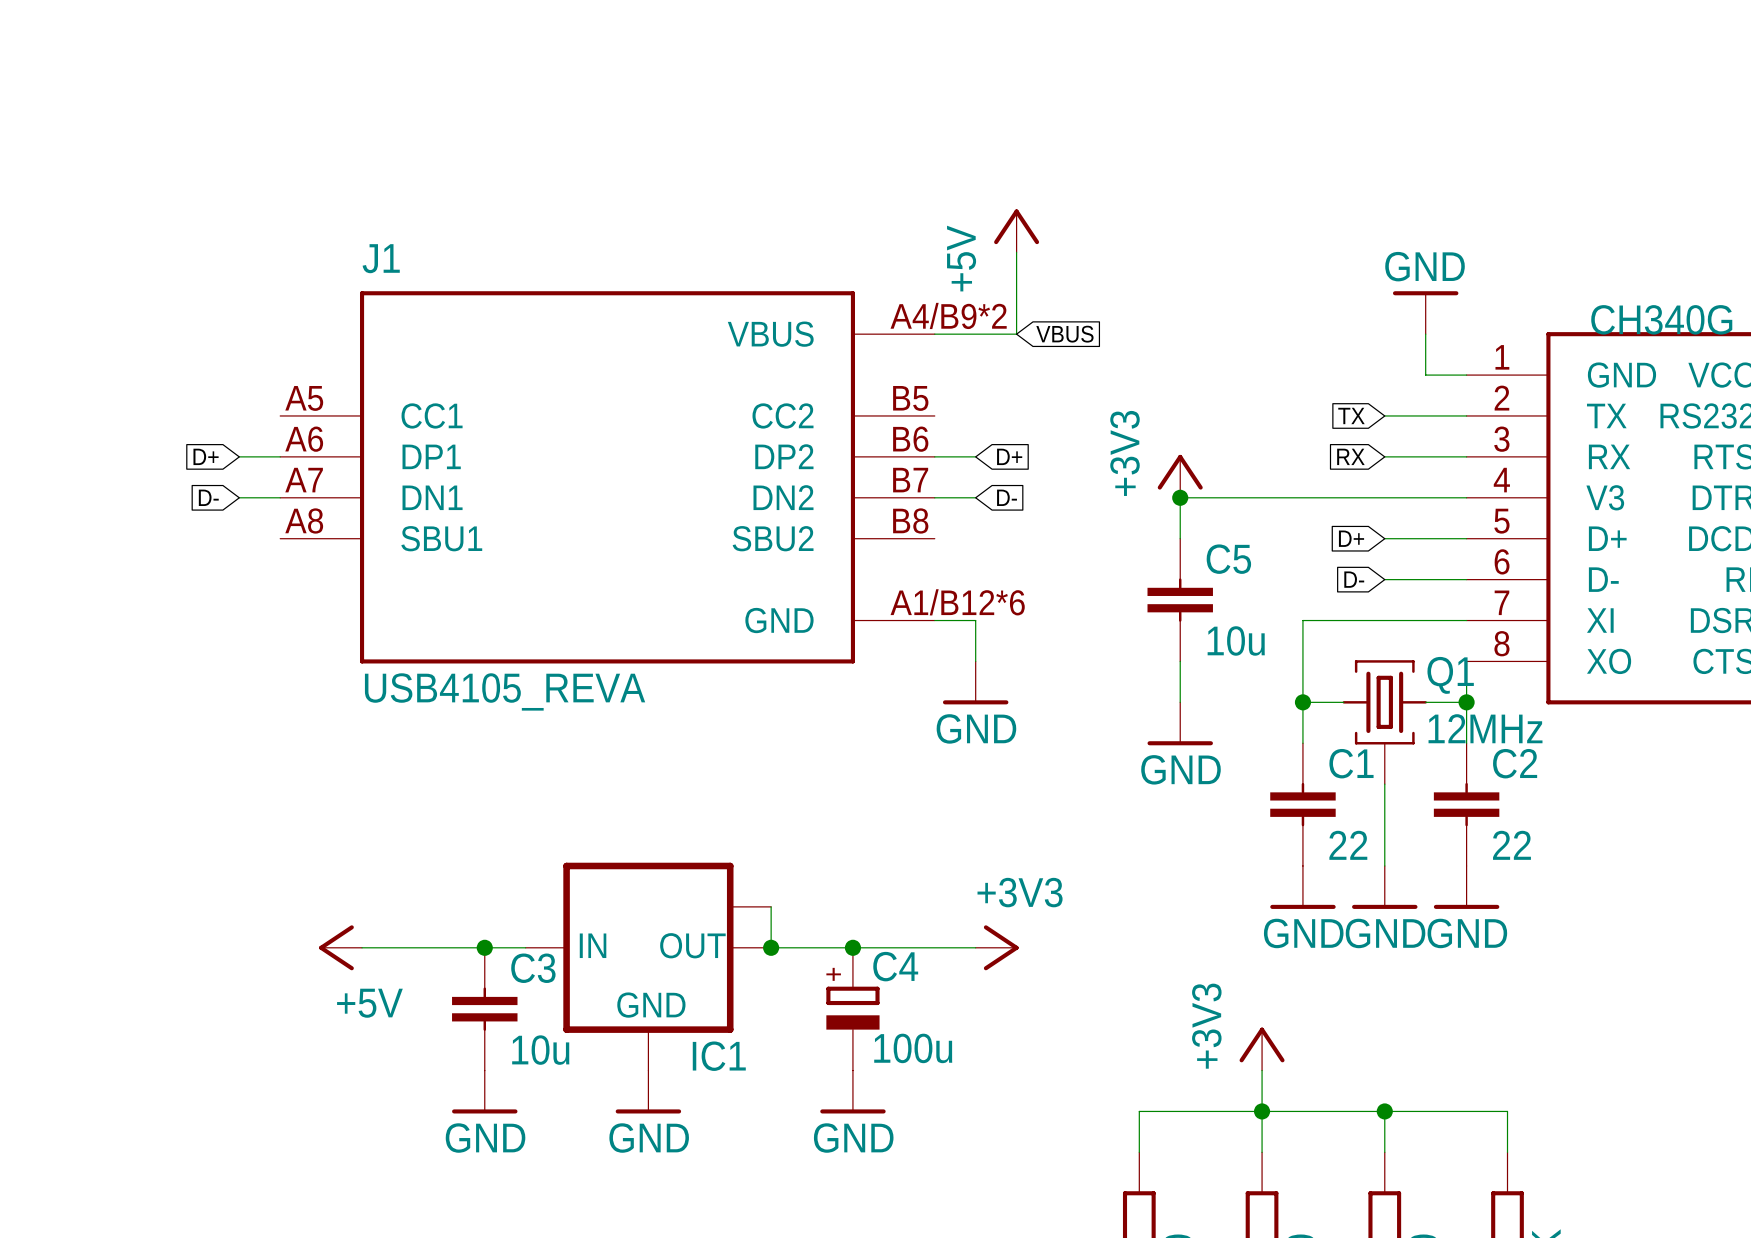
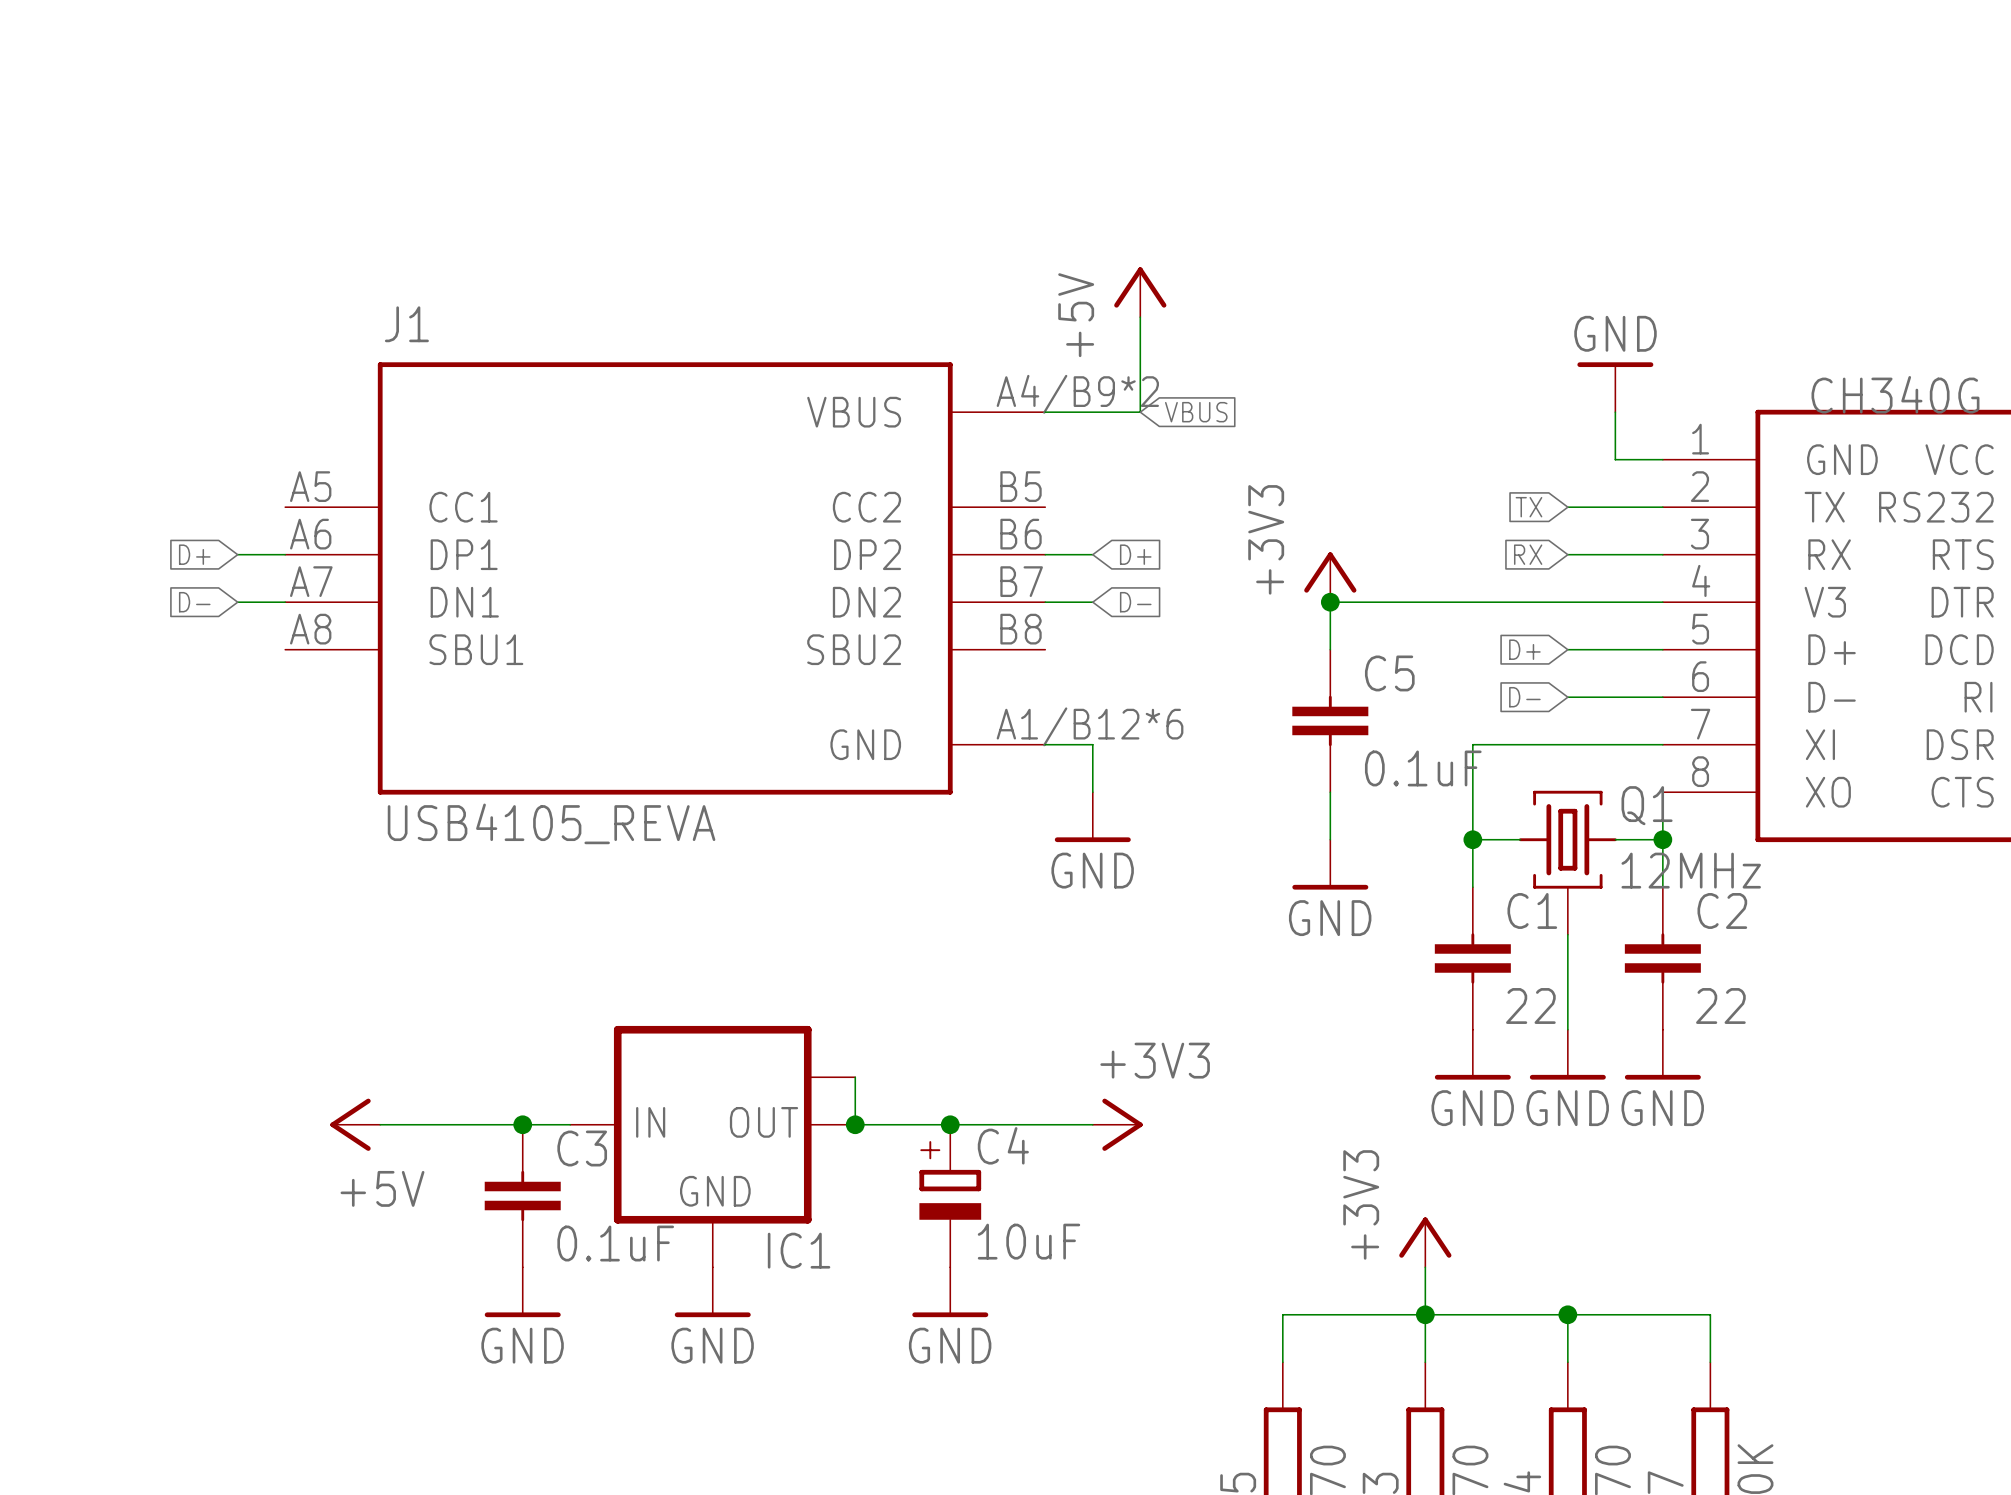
C5 value: 10u (1236, 640) -> 0.1uF (1423, 768)
C4 value: 100u (913, 1048) -> 10uF (1028, 1241)
C3 value: 10u (540, 1050) -> 0.1uF (615, 1243)

